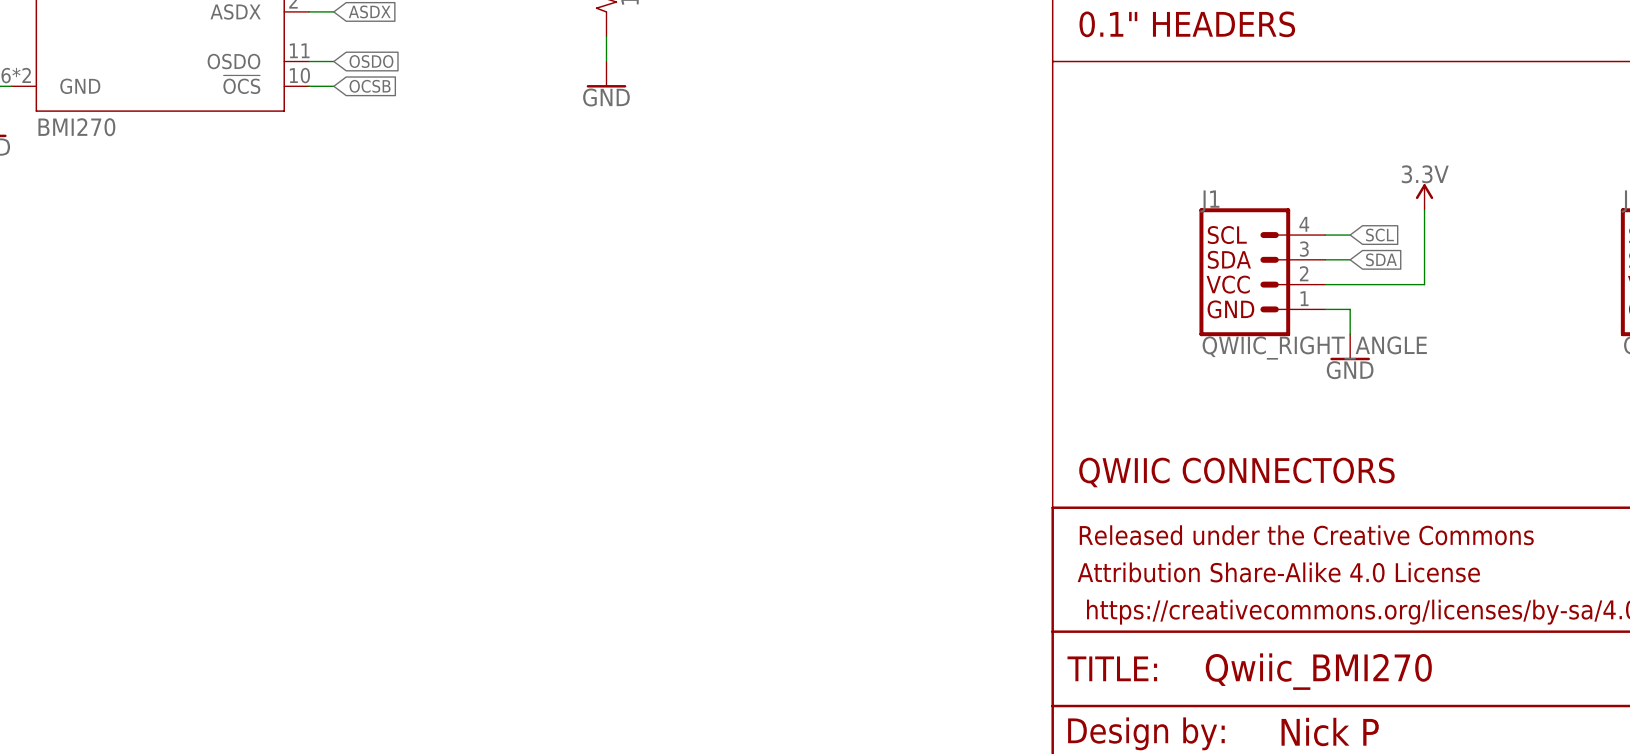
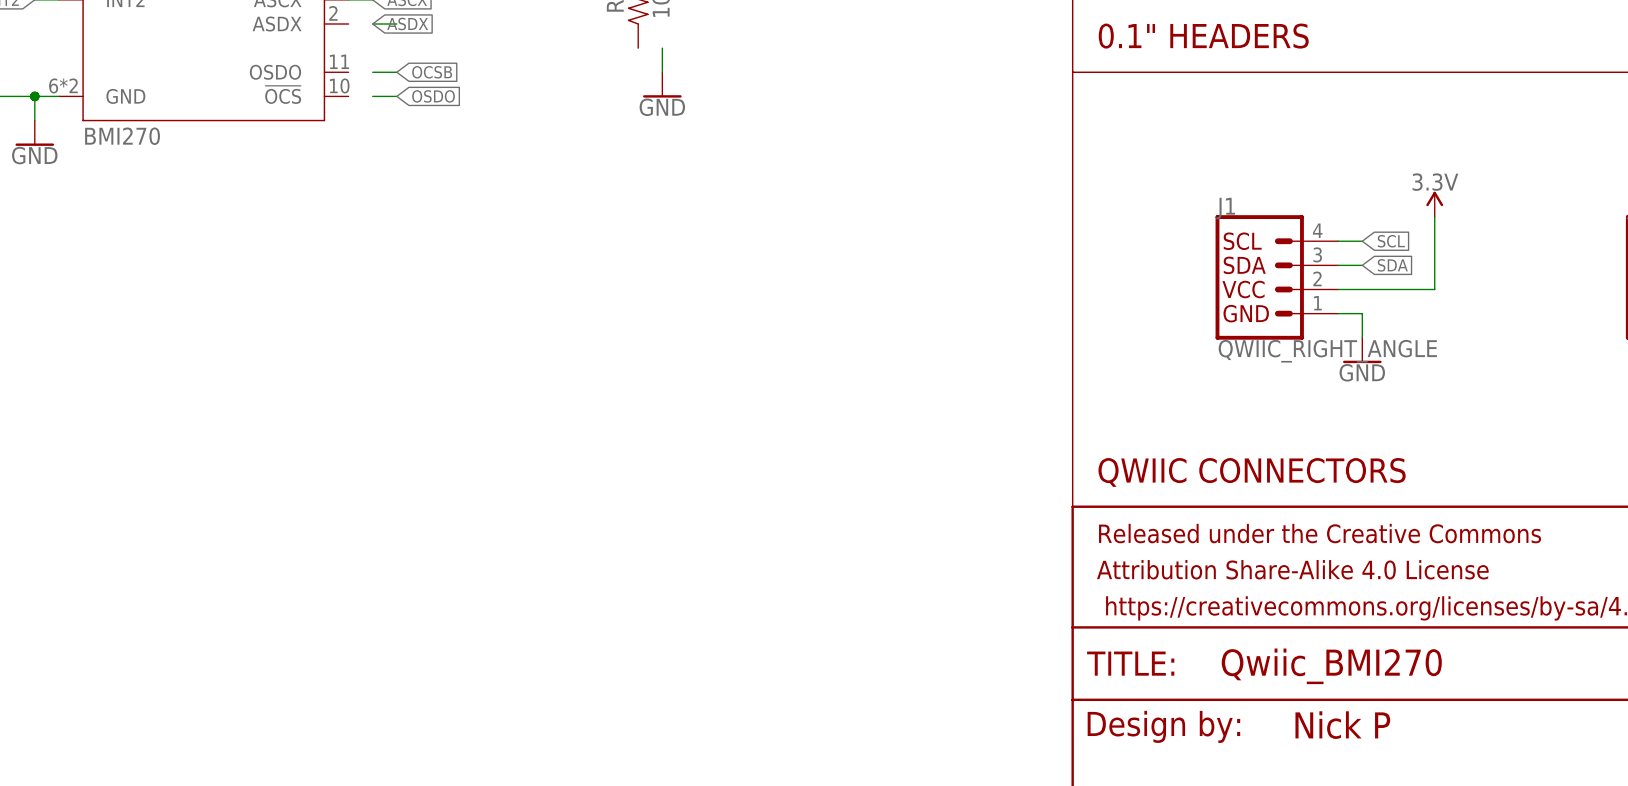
wire: (309, 11) (333, 11) -> (396, 23) (372, 23)
wire: (606, 36) (606, 61) -> (662, 48) (662, 72)
wire: (309, 61) (333, 61) -> (396, 72) (372, 72)
global label position: OSDO (371, 61) -> OSDO (433, 96)
power symbol position: GND (606, 74) -> GND (662, 84)
wire: (309, 86) (333, 86) -> (396, 96) (372, 96)
global label position: OCSB (370, 86) -> OCSB (432, 72)

